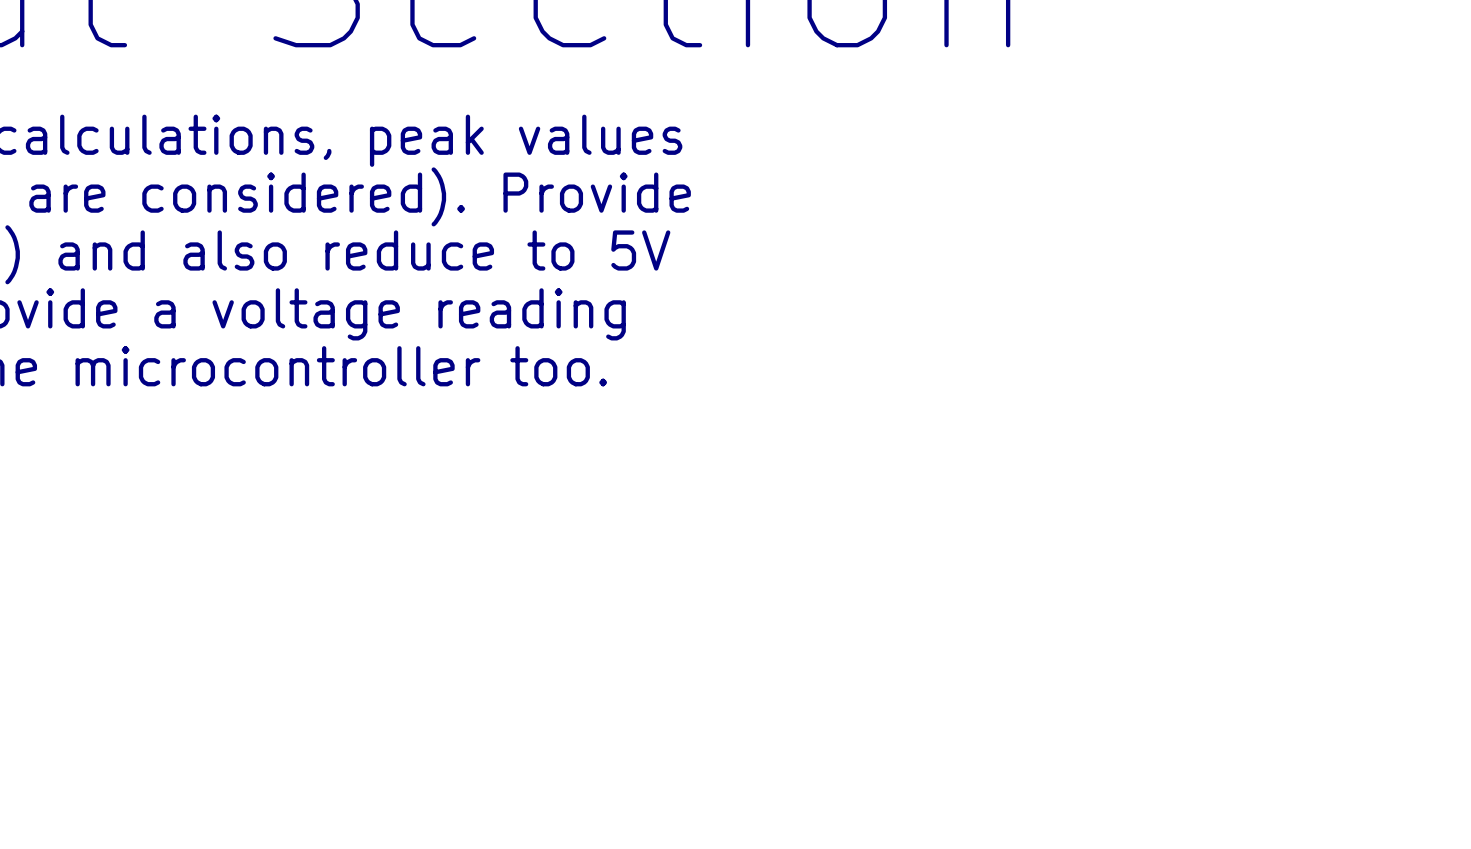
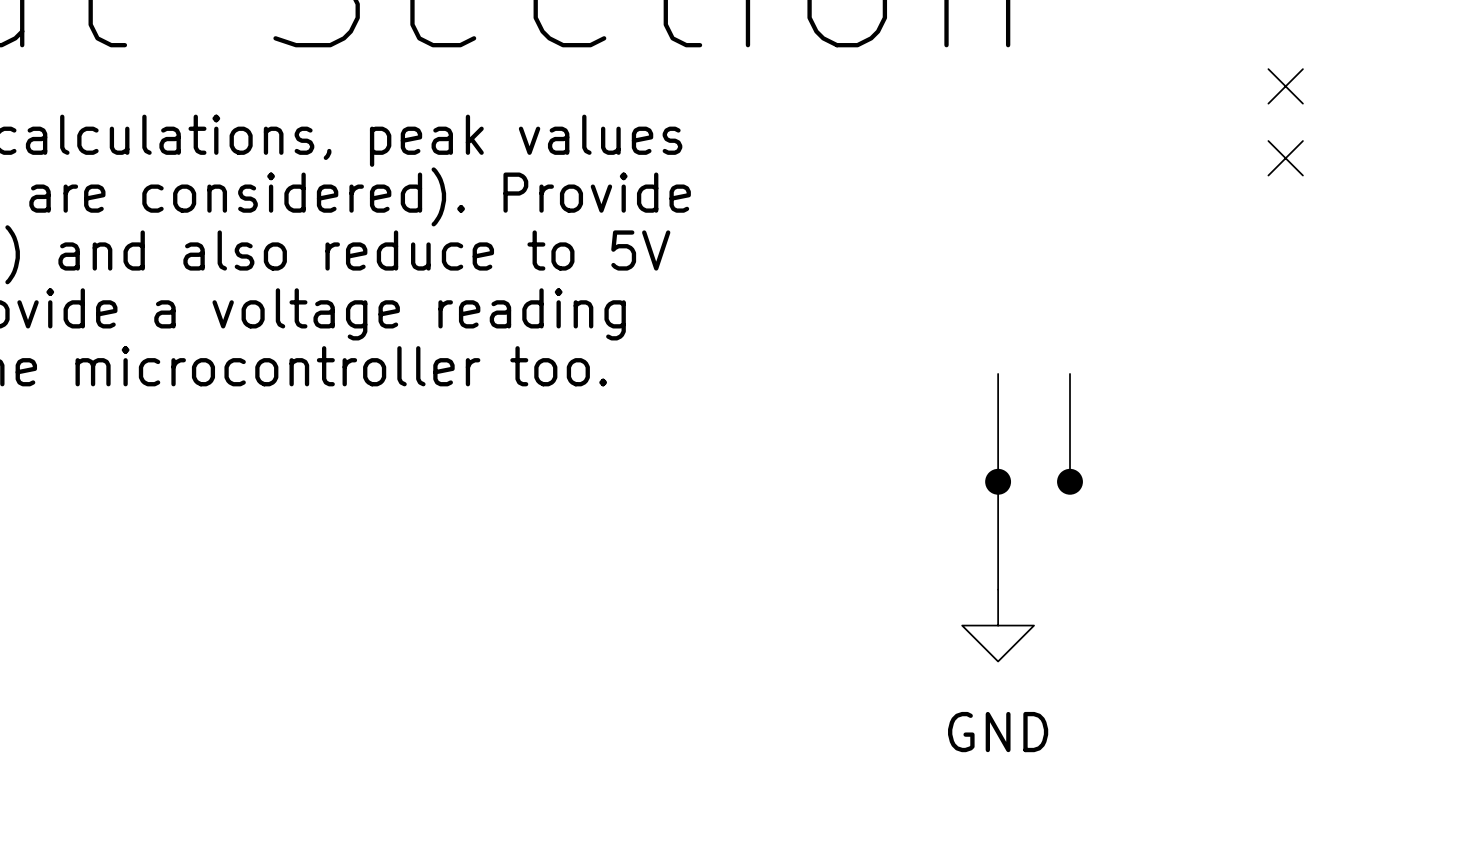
no-connect mark: none -> (1285, 86)
no-connect mark: none -> (1285, 158)
wire: none -> (998, 373) (998, 589)
wire: none -> (1070, 373) (1070, 481)
junction: none -> (998, 481)
junction: none -> (1070, 481)
power symbol: none -> GND (998, 625)

